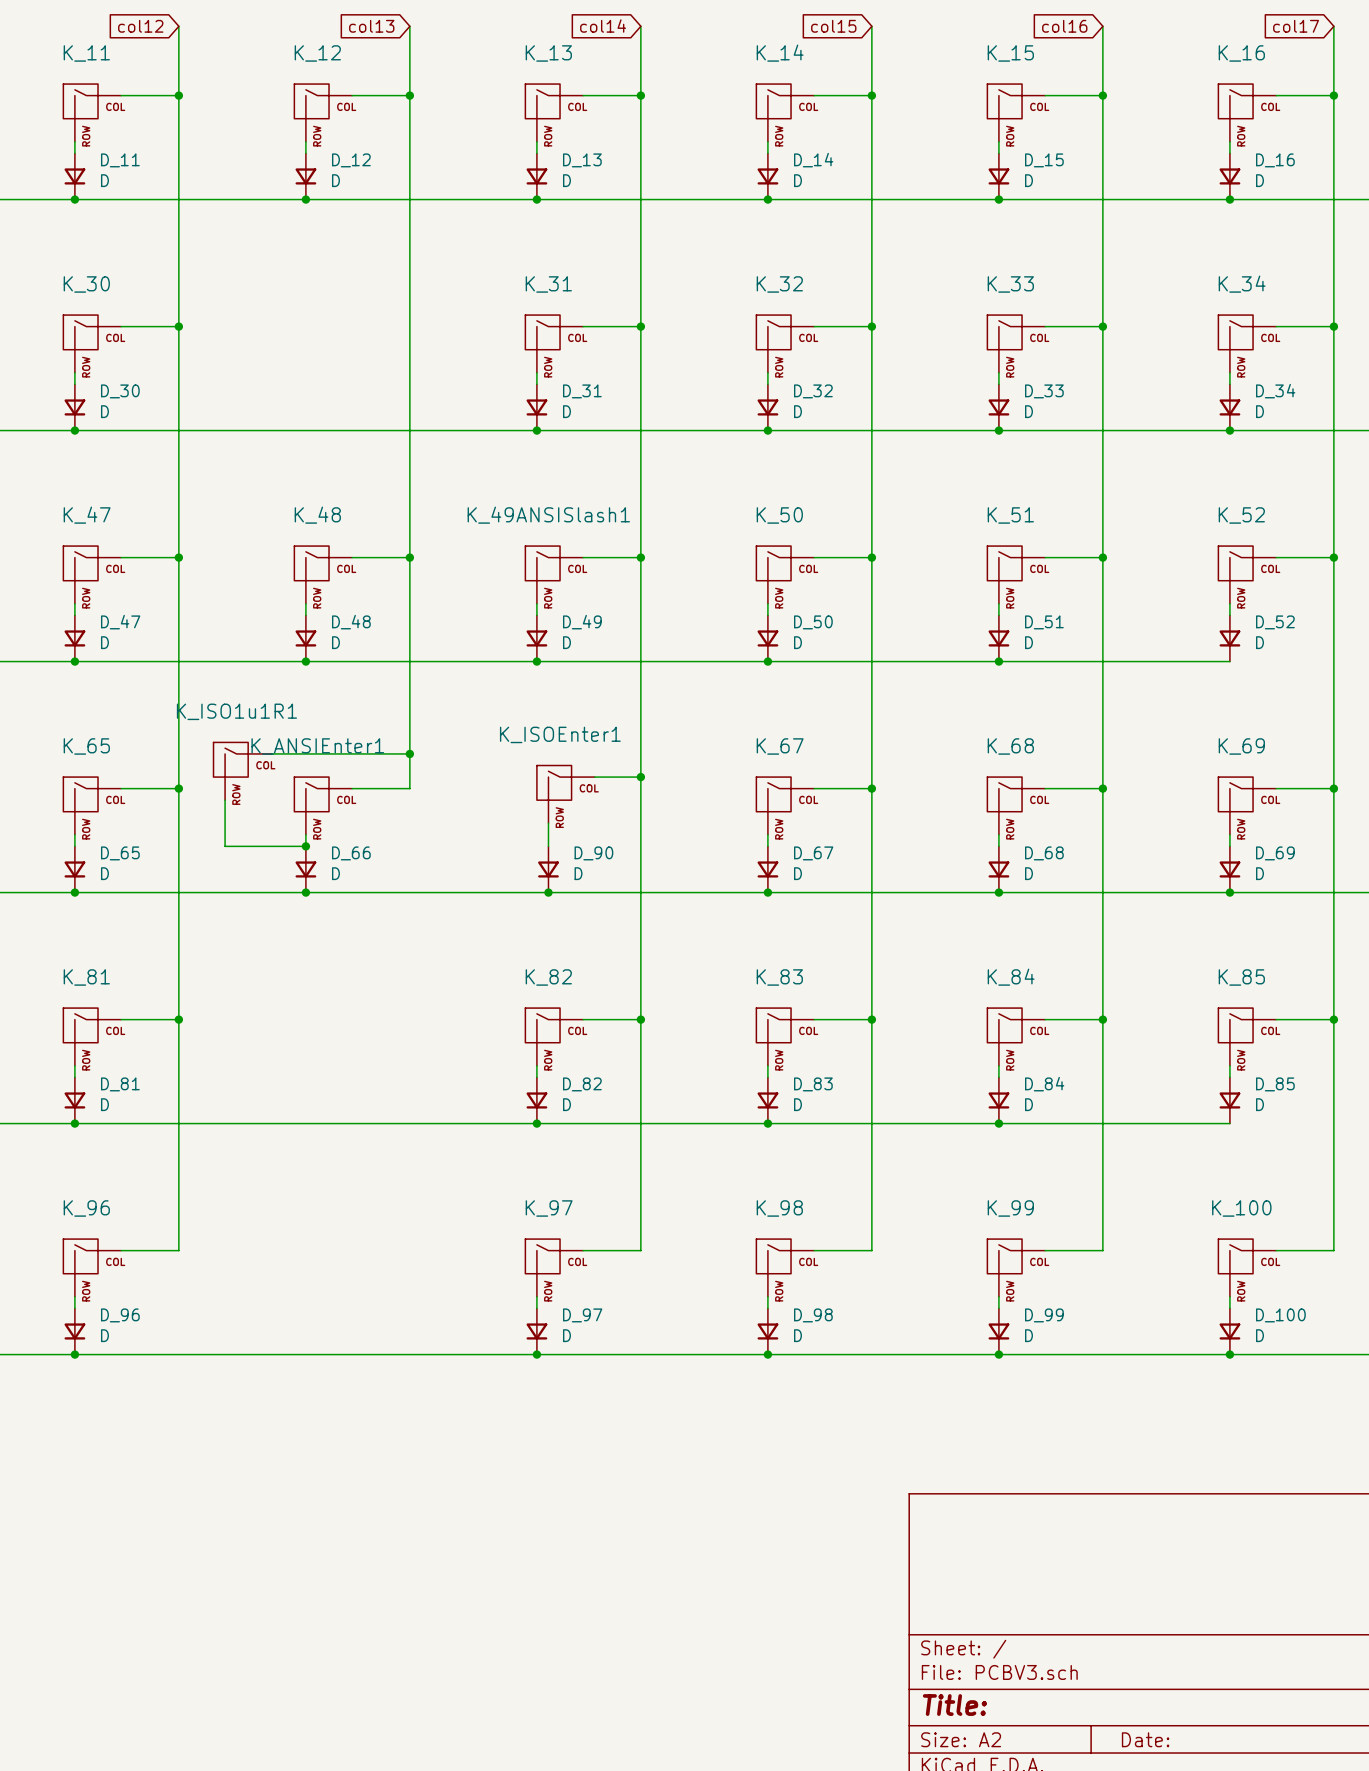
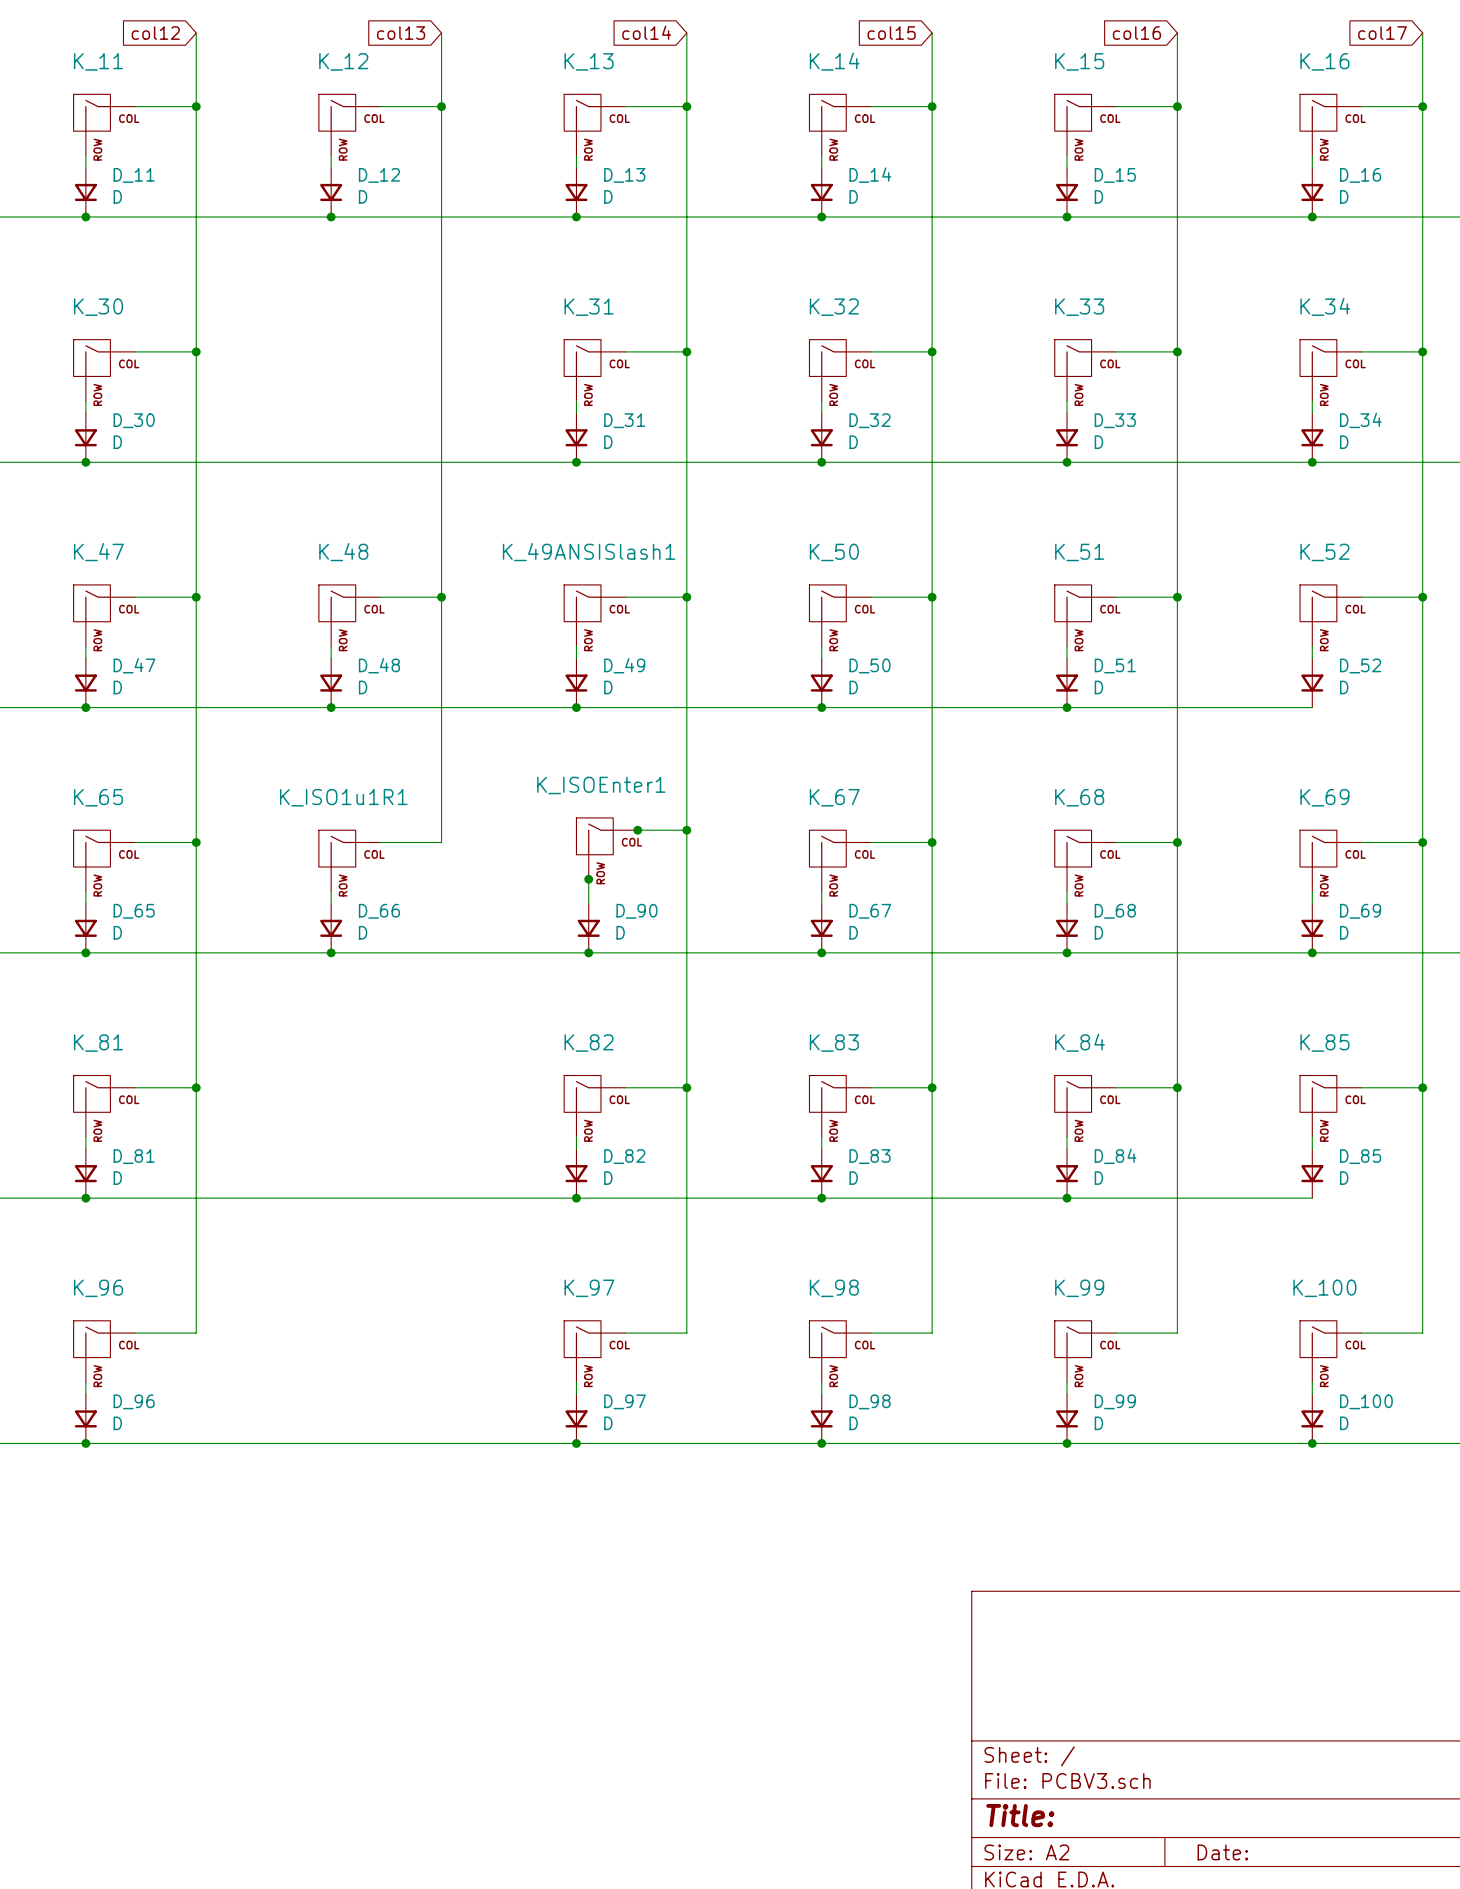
K_ANSIEnter1 name: K_ANSIEnter1 (317, 746) -> K_ISO1u1R1 (343, 797)
wire: (271, 753) (409, 753) -> none
junction: (409, 753) -> none
K_ISO1u1R1: (242, 771) -> none
junction: none -> (637, 830)
wire: (225, 800) (225, 846) (305, 846) -> none
junction: none -> (588, 879)
junction: (305, 846) -> none

